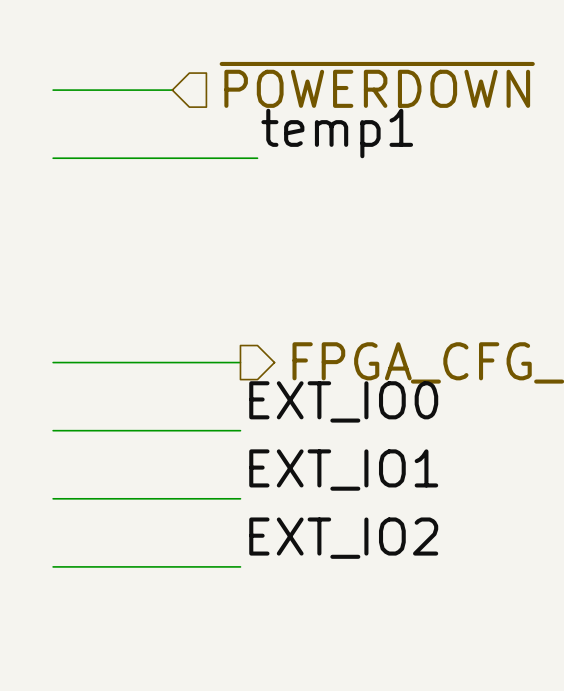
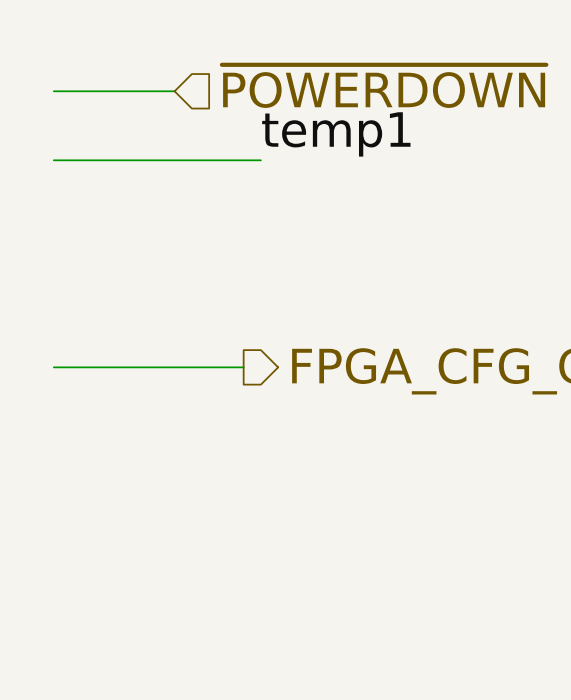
label: EXT_IO0 (343, 401) -> none
wire: (53, 430) (240, 430) -> none
label: EXT_IO1 (343, 470) -> none
wire: (53, 498) (240, 498) -> none
label: EXT_IO2 (343, 538) -> none
wire: (53, 566) (240, 566) -> none

